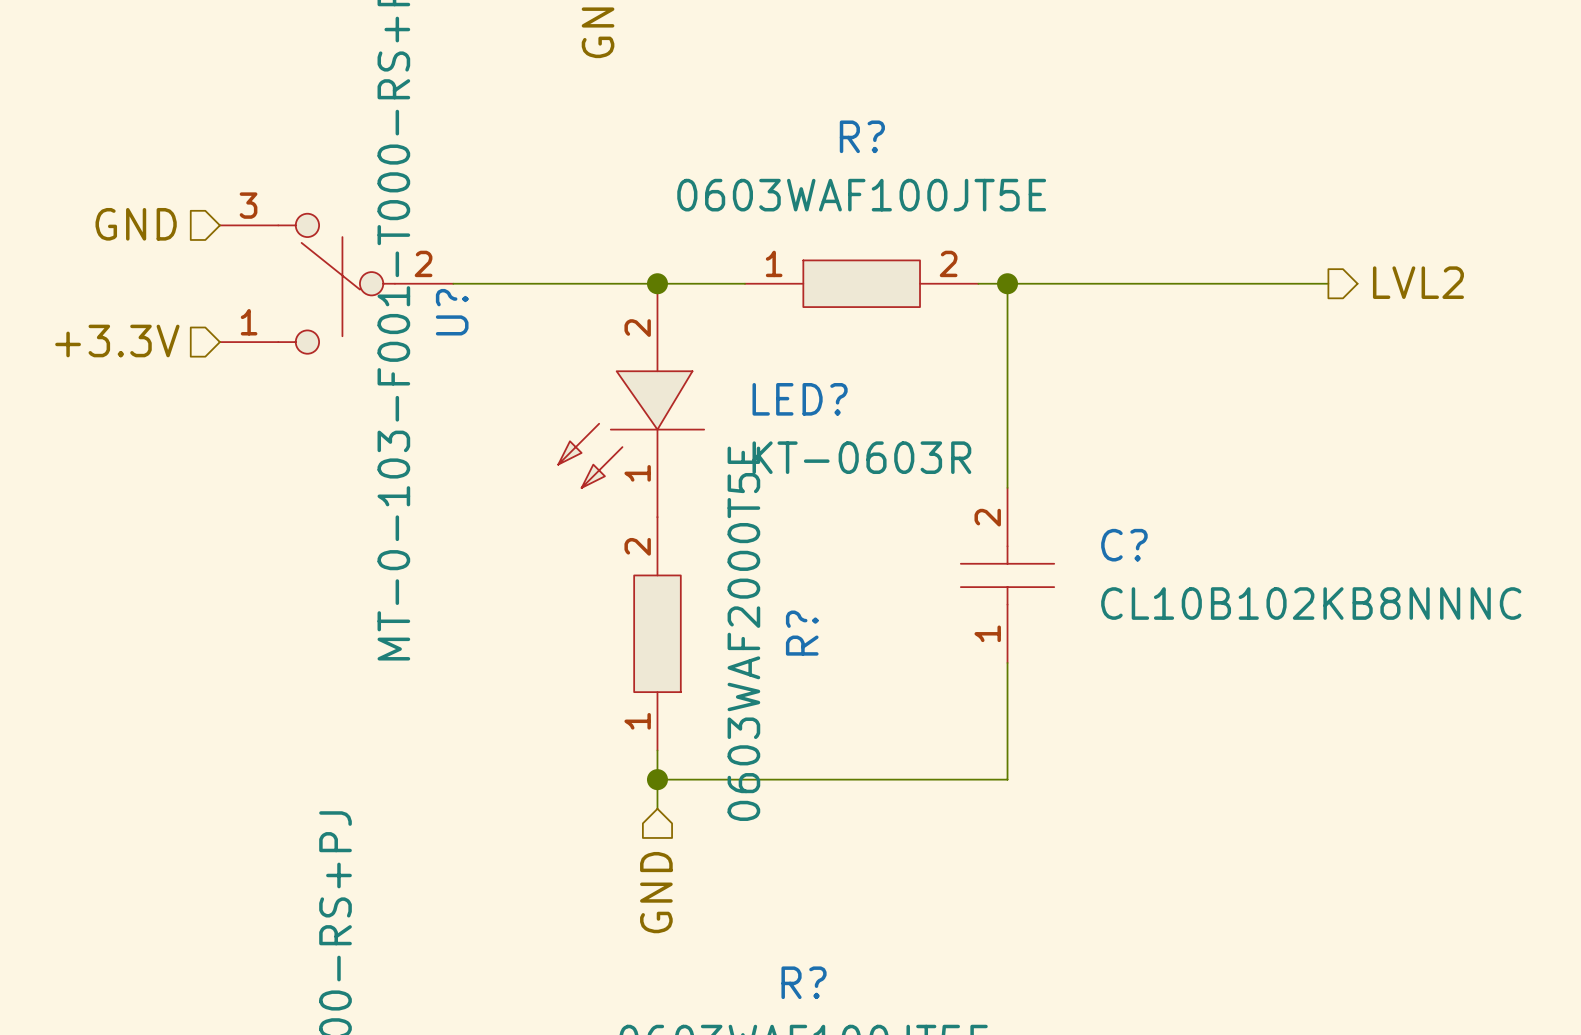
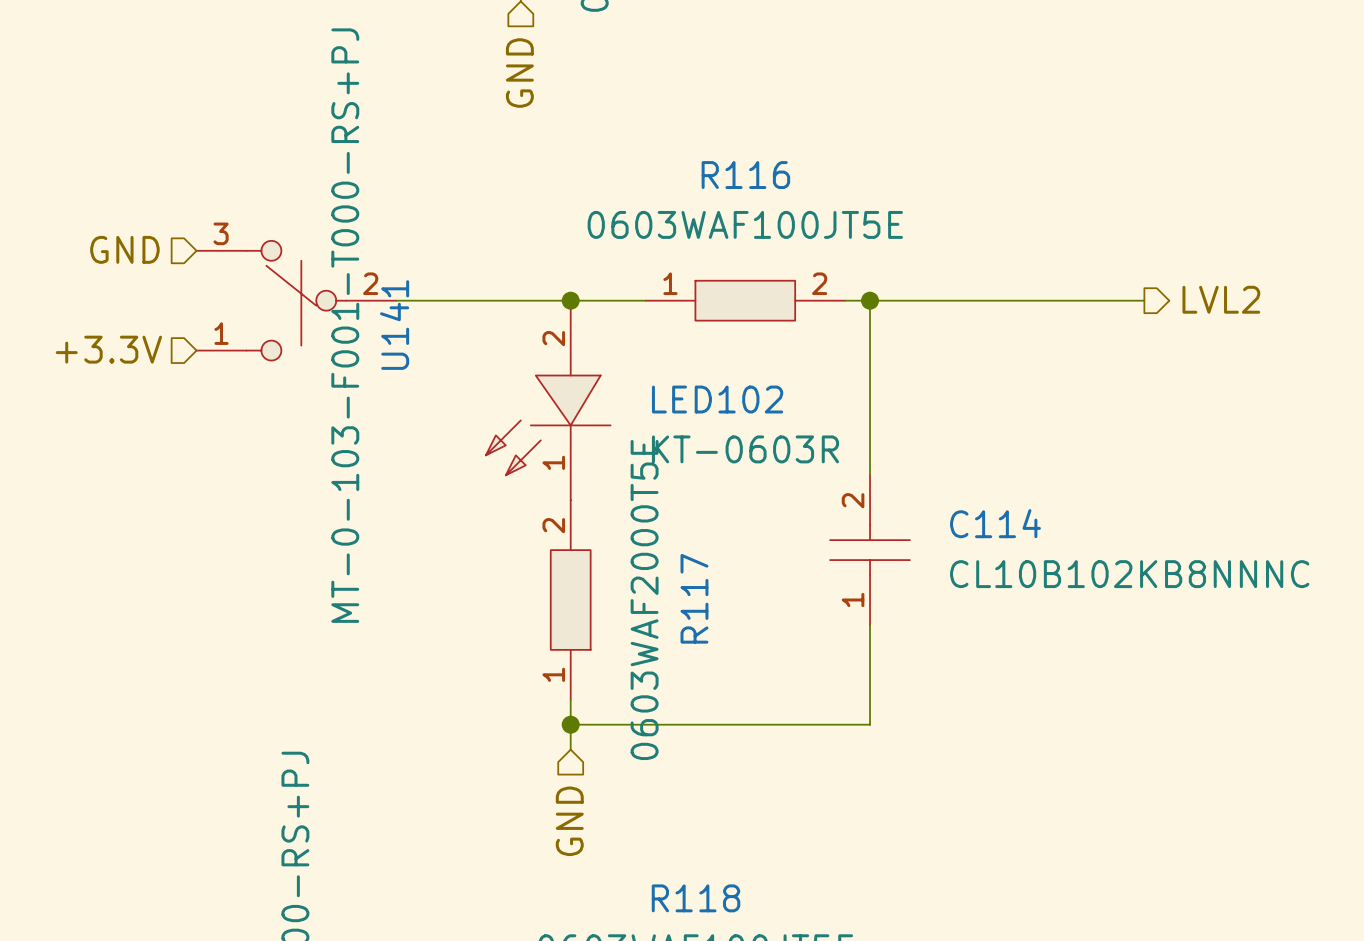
R? name: R? (862, 136) -> R116 (745, 175)
U? name: U? (452, 312) -> U141 (394, 325)
LED? name: LED? (800, 399) -> LED102 (717, 399)
C? name: C? (1124, 545) -> C114 (995, 523)
R? name: R? (802, 633) -> R117 (694, 598)
R? name: R? (804, 982) -> R118 (696, 898)

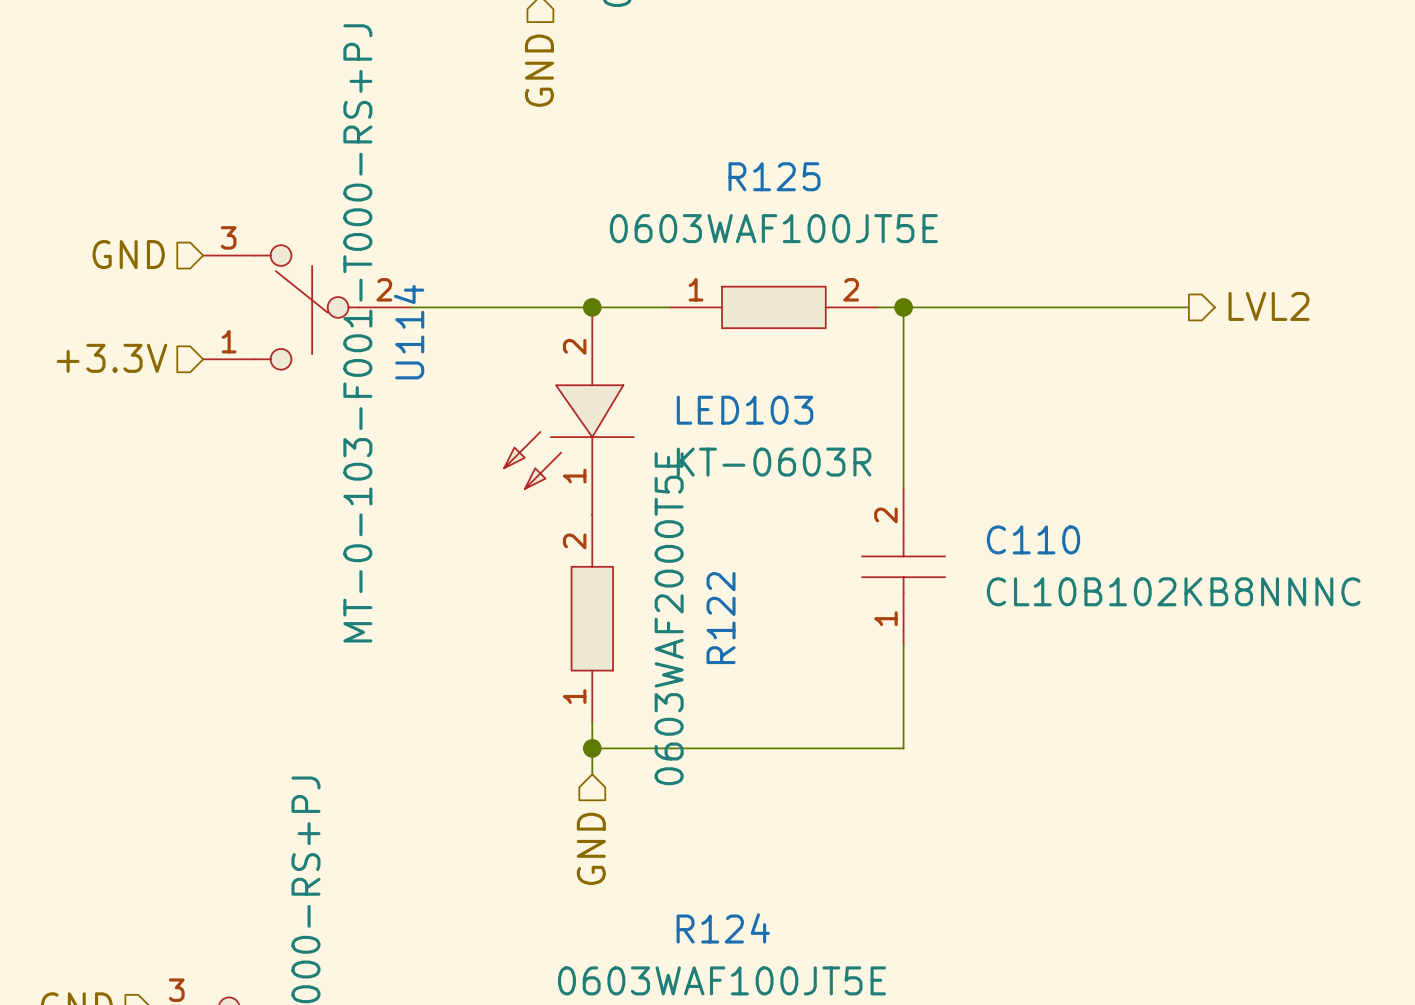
R116 name: R116 (745, 175) -> R125 (774, 176)
U141 name: U141 (394, 325) -> U114 (409, 332)
LED102 name: LED102 (717, 399) -> LED103 (745, 410)
C114 name: C114 (995, 523) -> C110 (1033, 539)
R117 name: R117 (694, 598) -> R122 (721, 618)
R118 name: R118 (696, 898) -> R124 (723, 928)

